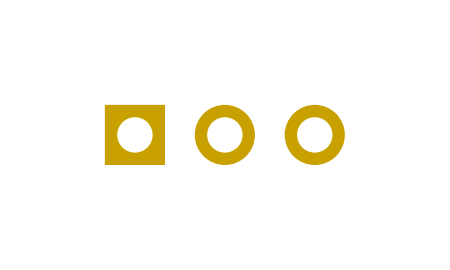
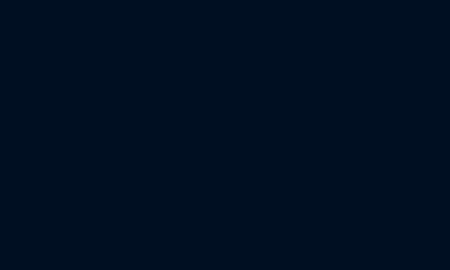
part: (224, 134) -> none

